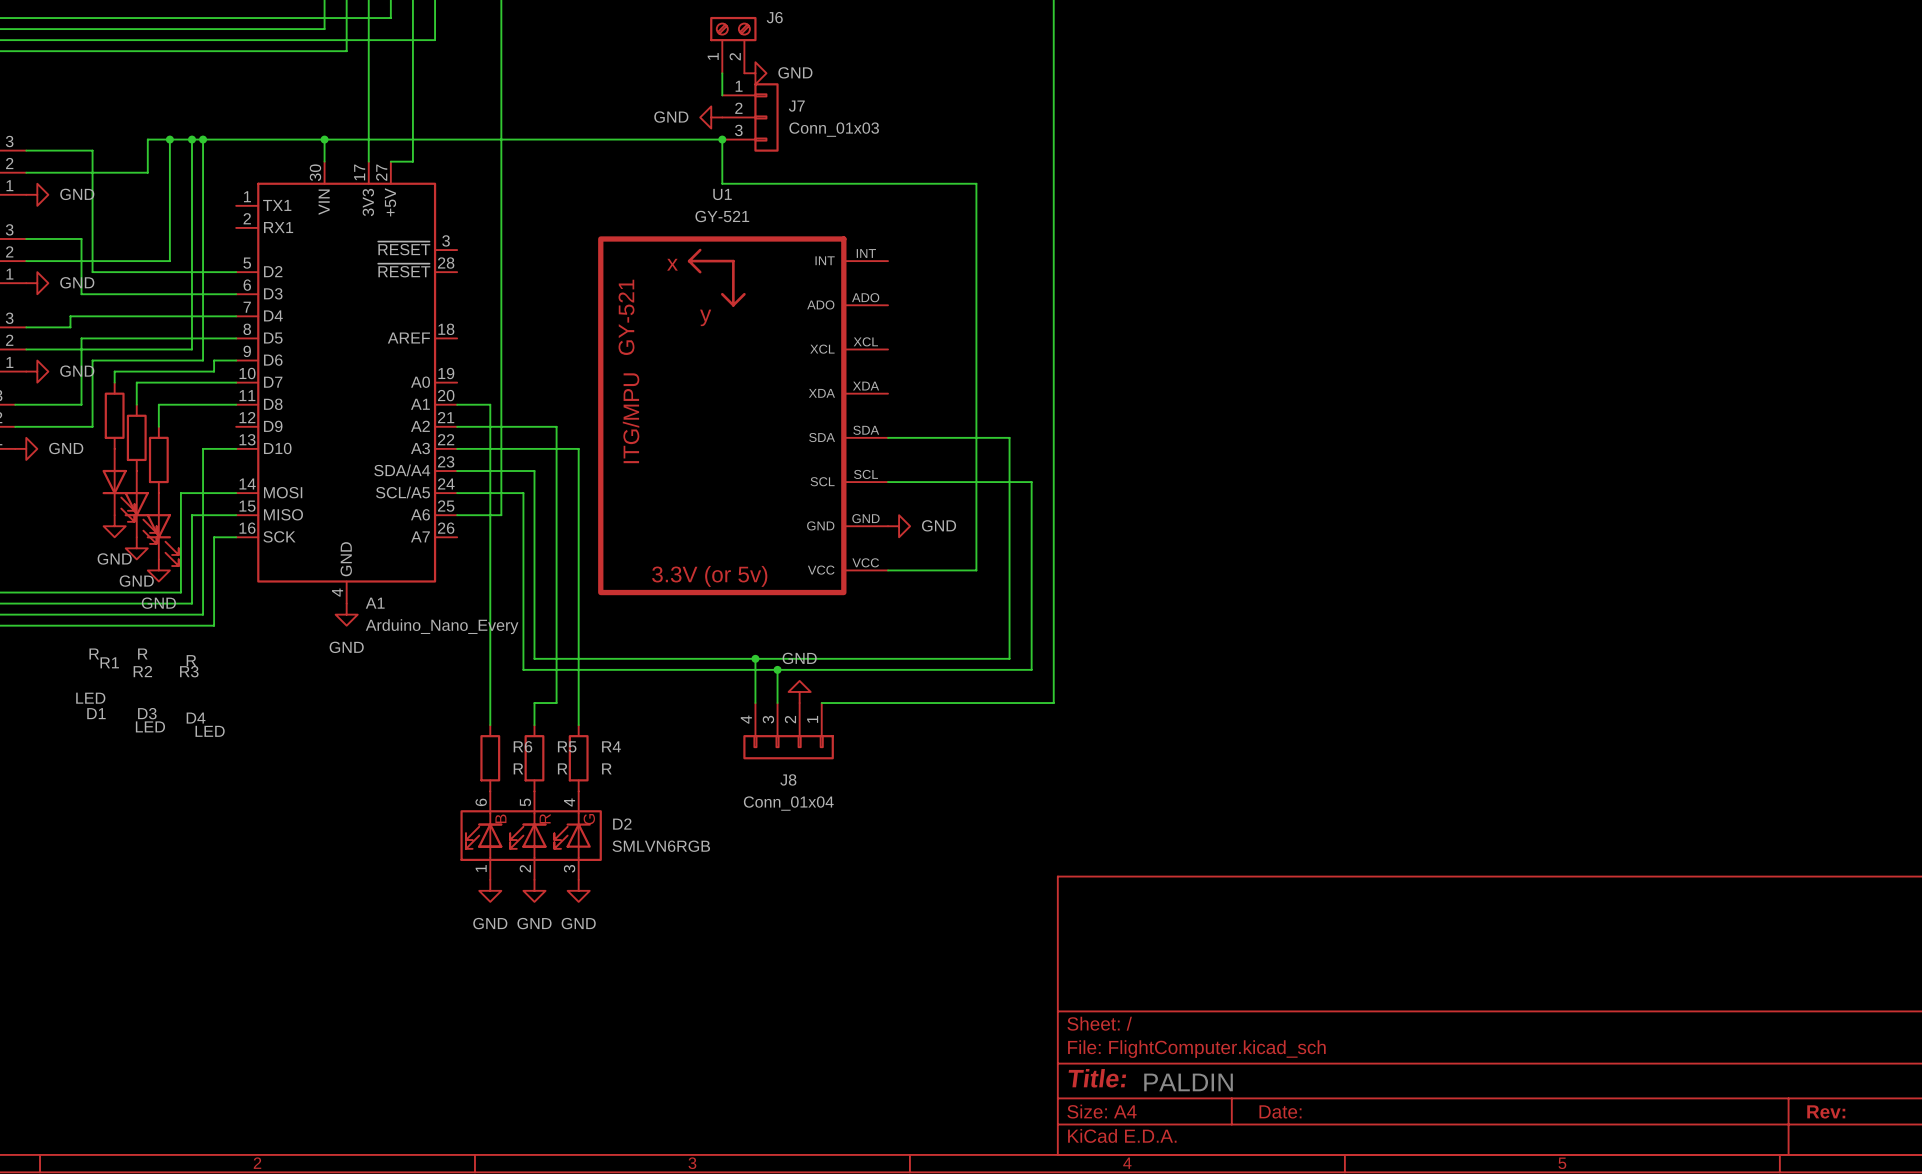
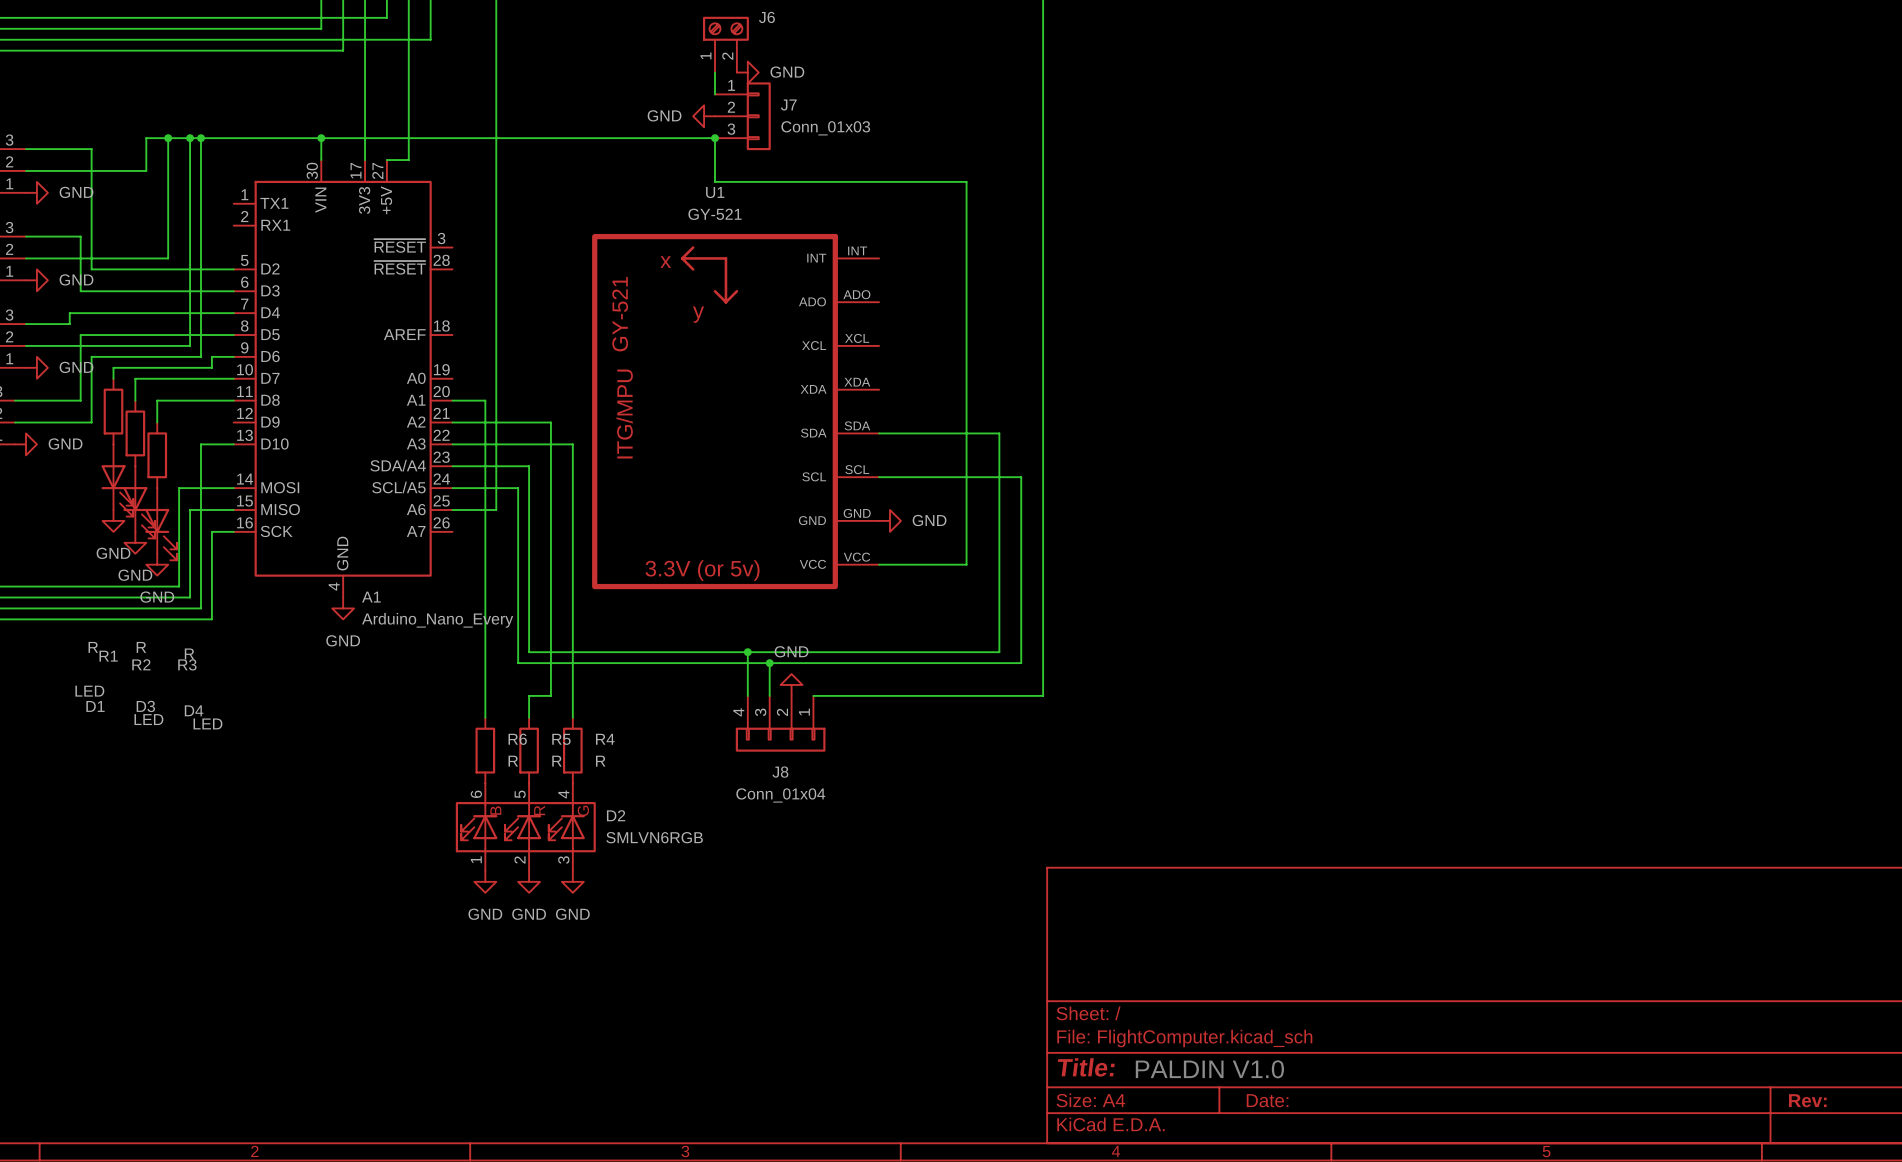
text: PALDIN (1188, 1082) -> PALDIN V1.0 (1209, 1069)

